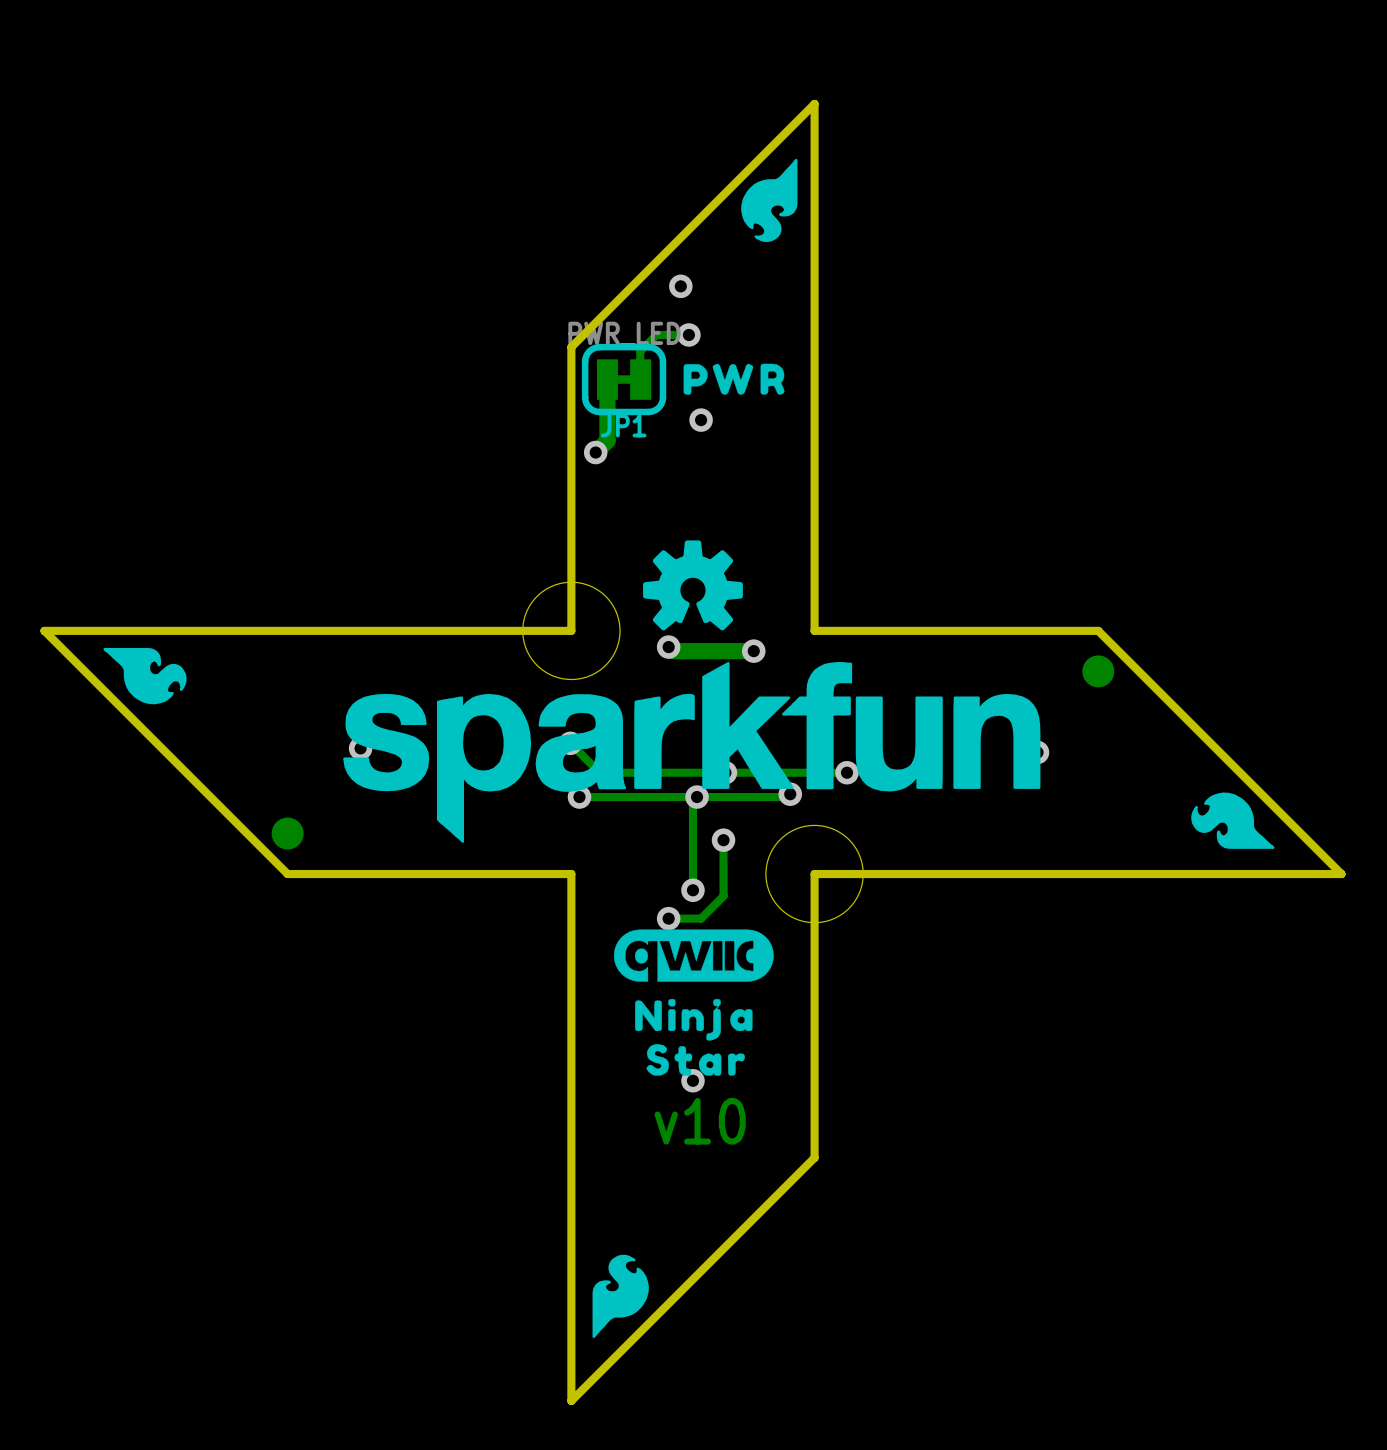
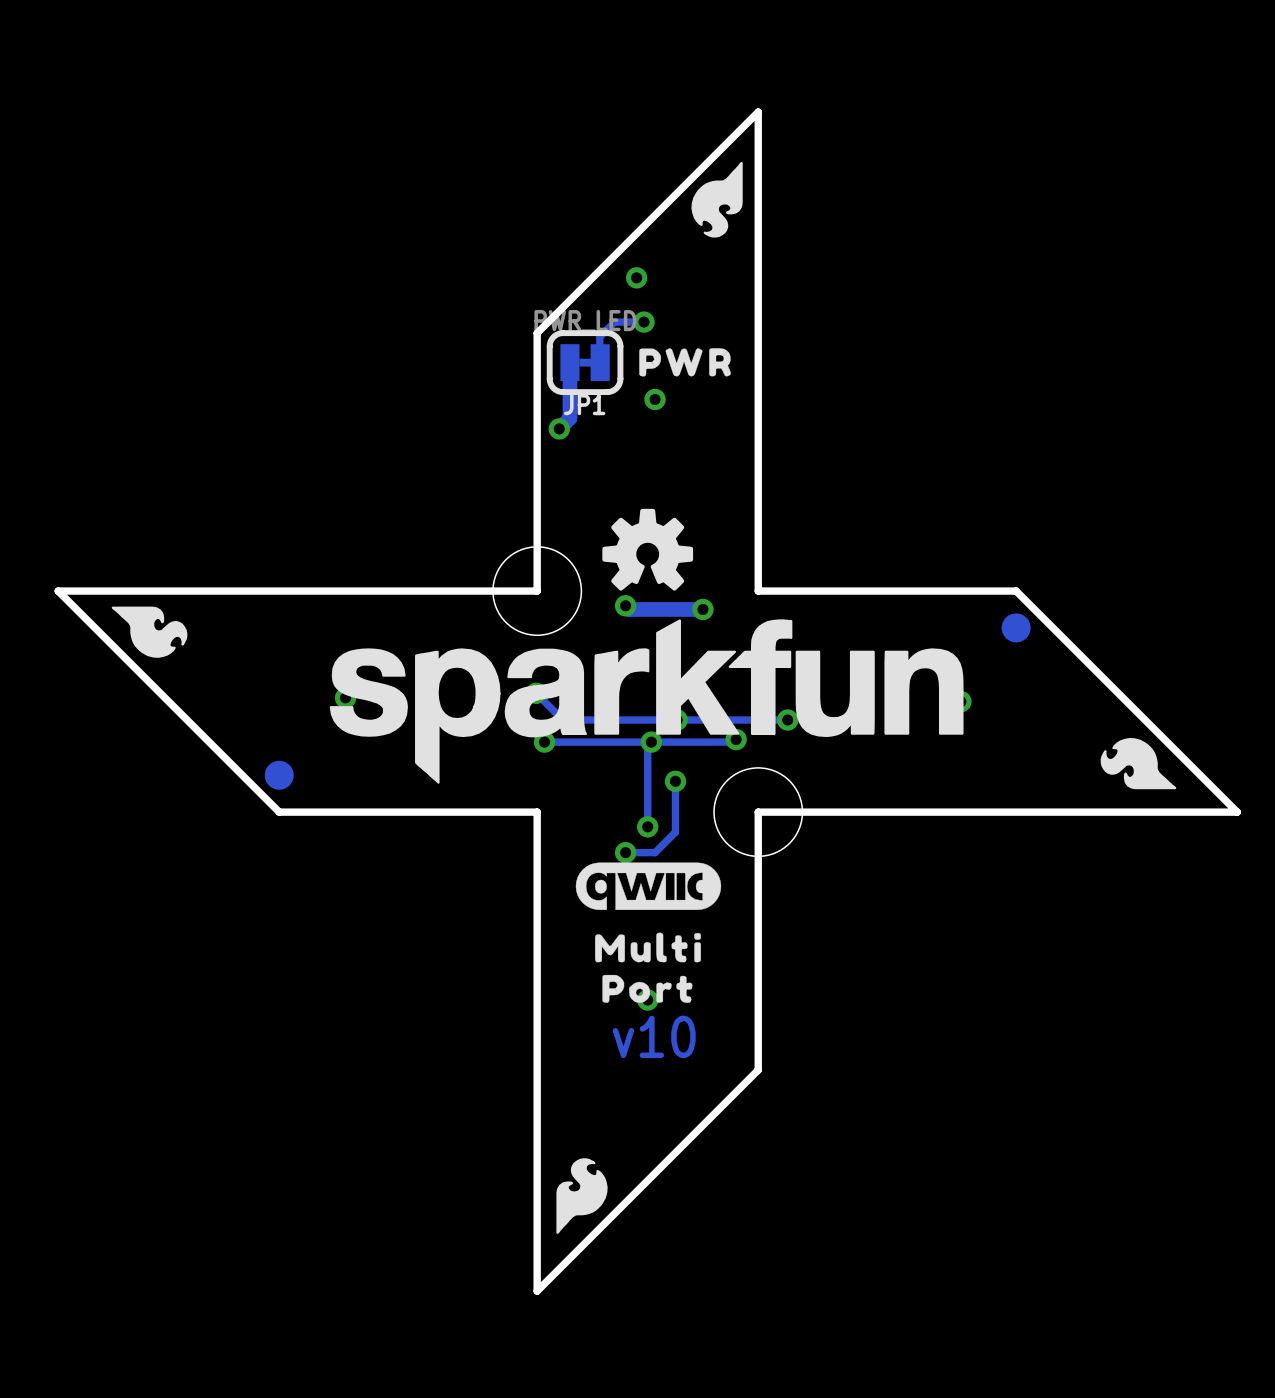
drawing shape: [635, 998, 753, 1041] -> [595, 932, 701, 963]
drawing shape: [646, 1044, 745, 1076] -> [602, 974, 693, 1003]

